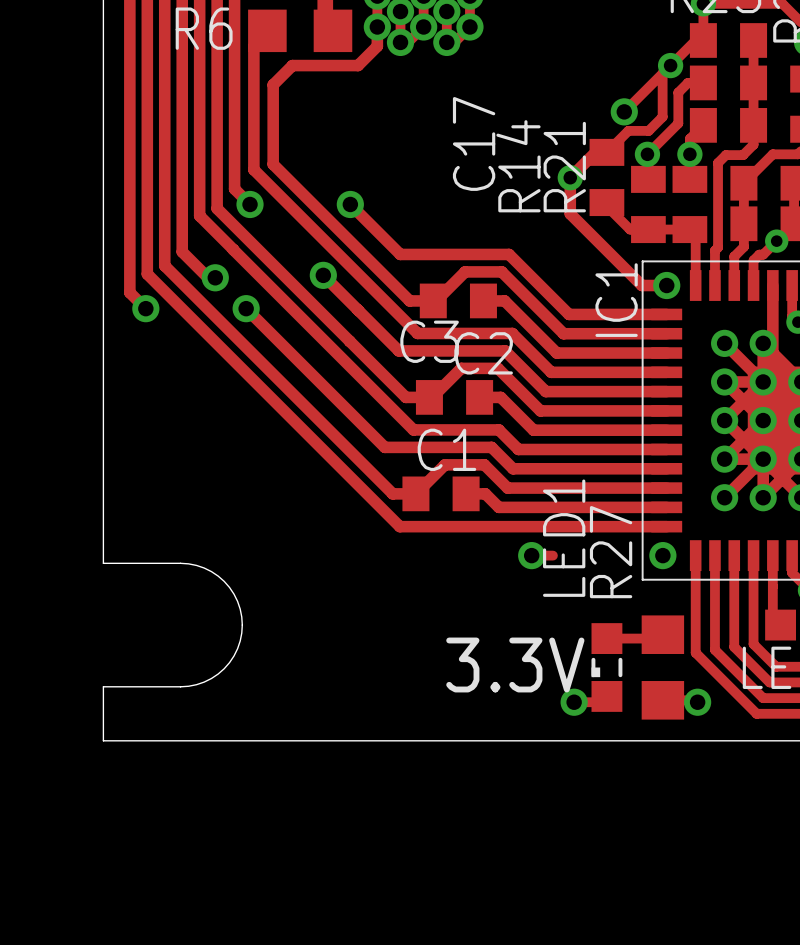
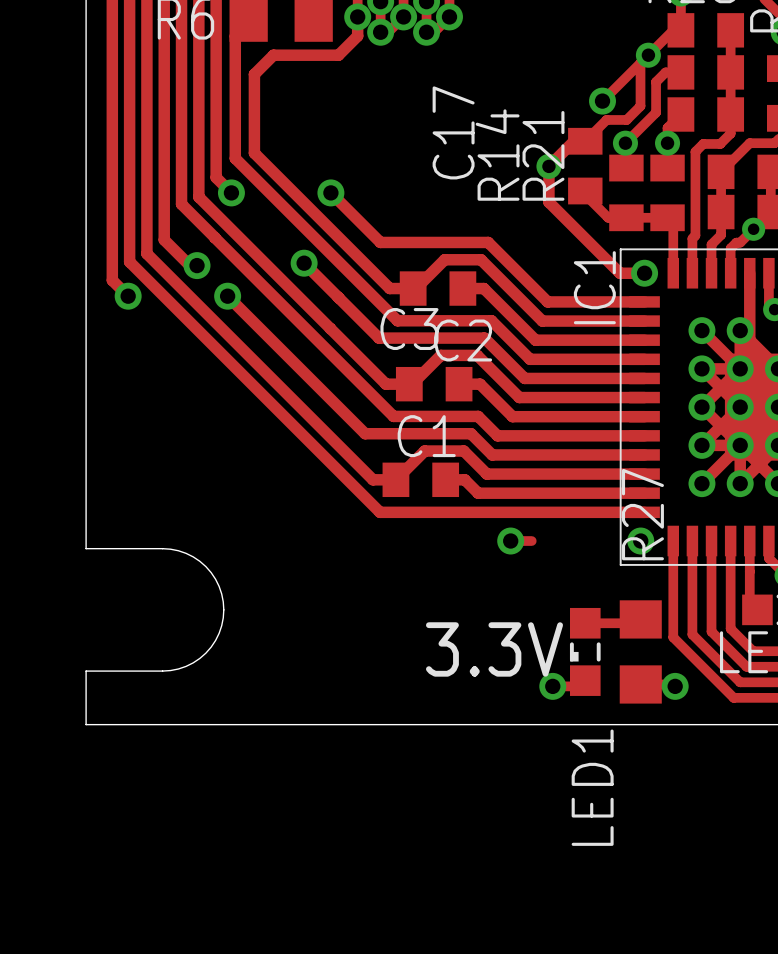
LED1 name position: LED1 (564, 538) -> LED1 (592, 787)
R27 name position: R27 (611, 552) -> R27 (642, 514)

